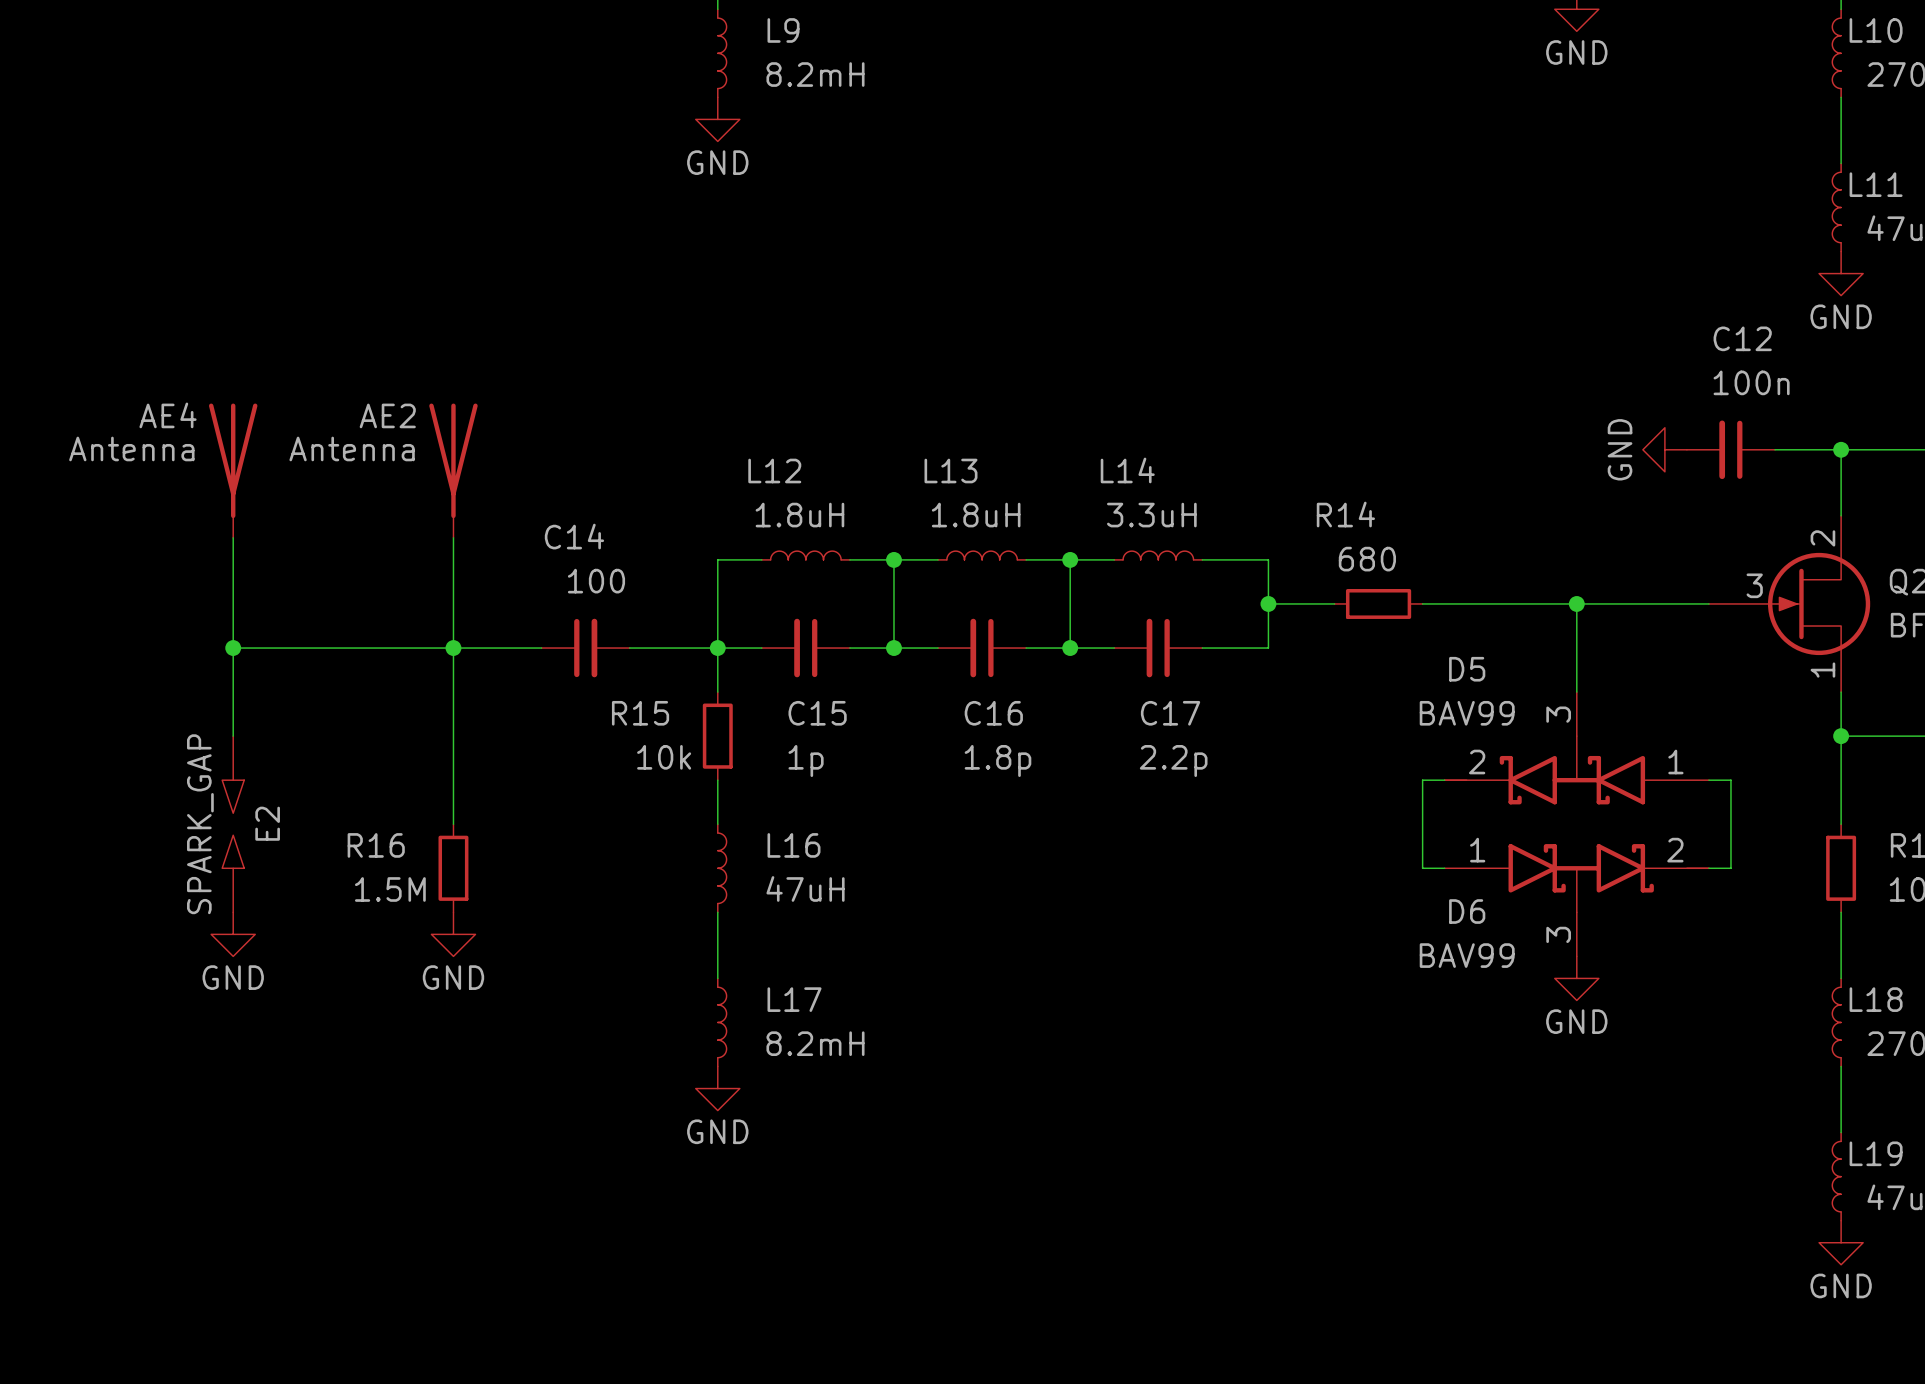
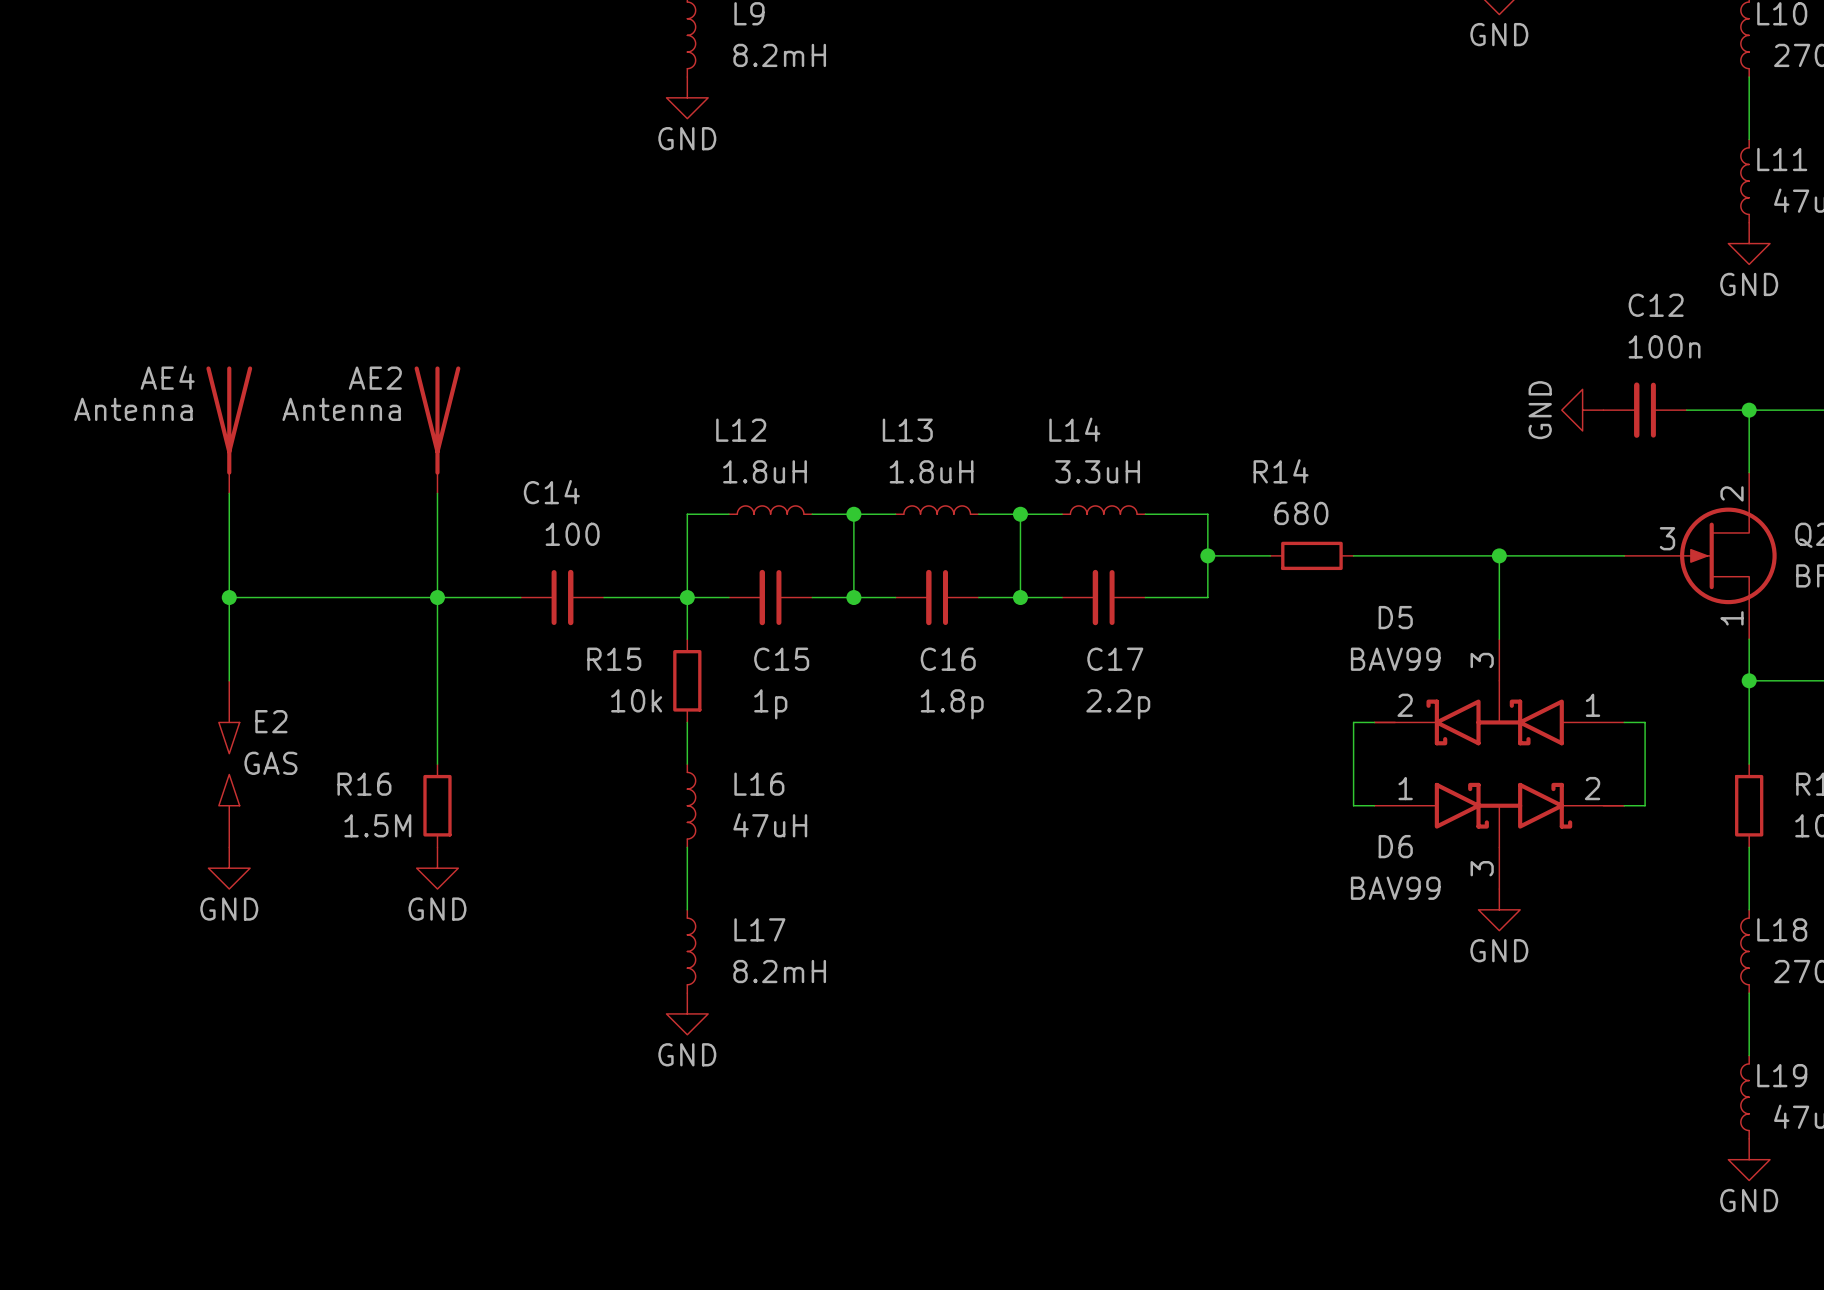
E2 name rotation: 0° (267, 823) -> 90° clockwise (271, 721)
E2 value: SPARK_GAP (200, 824) -> GAS (270, 763)

